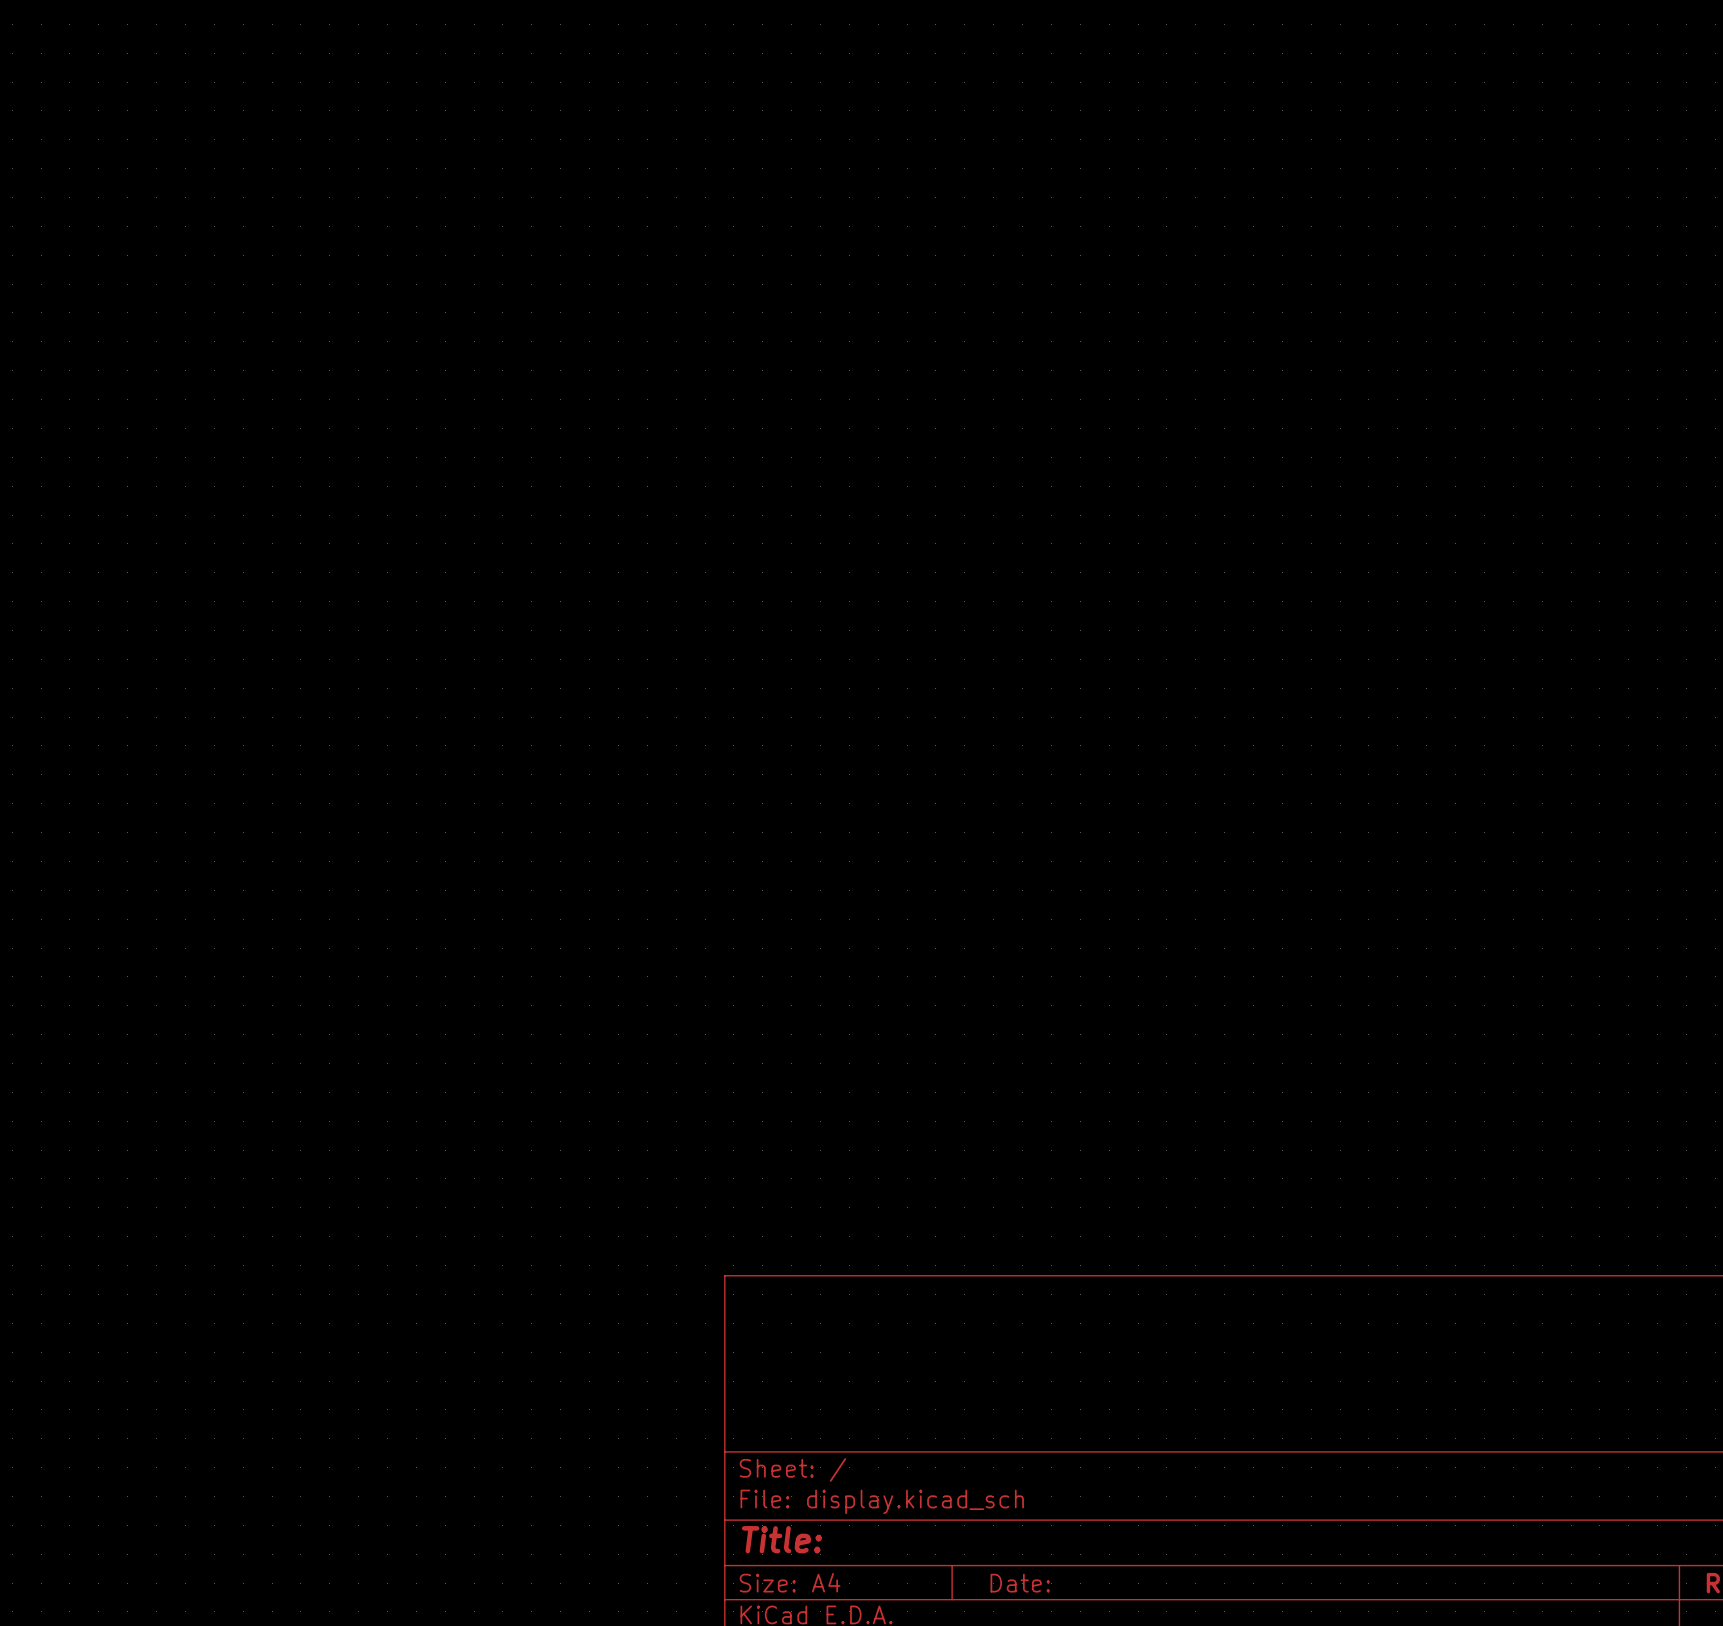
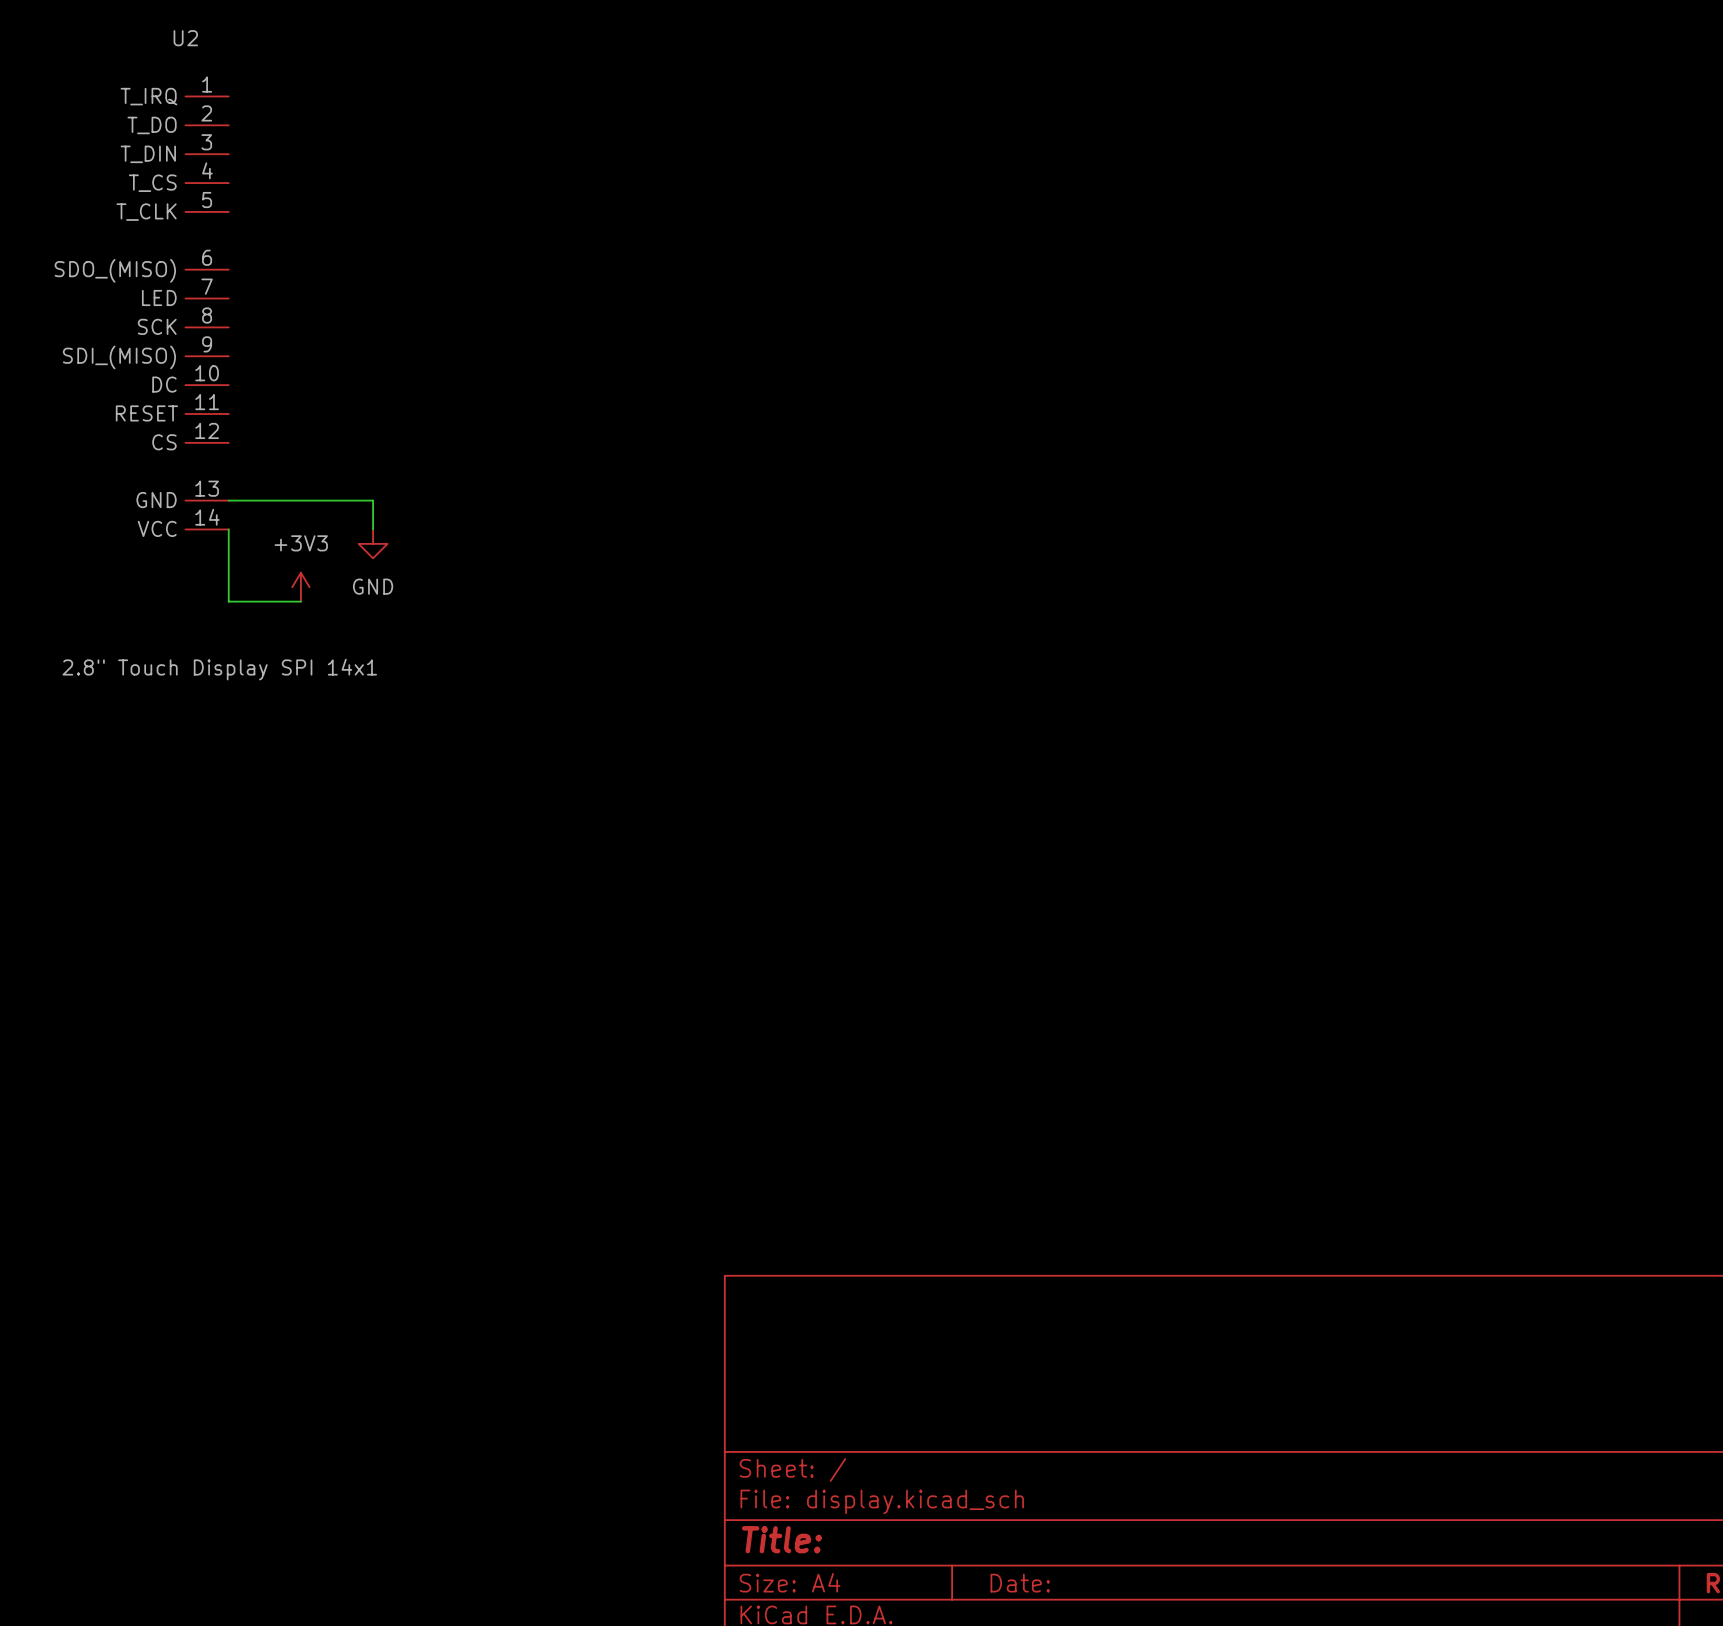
U2: none -> 2.8" Touch Display SPI 14x1 (207, 312)
wire: none -> (228, 500) (373, 500) (373, 529)
wire: none -> (228, 529) (228, 601) (300, 601)
power symbol: none -> GND (373, 543)
power symbol: none -> +3V3 (300, 587)

